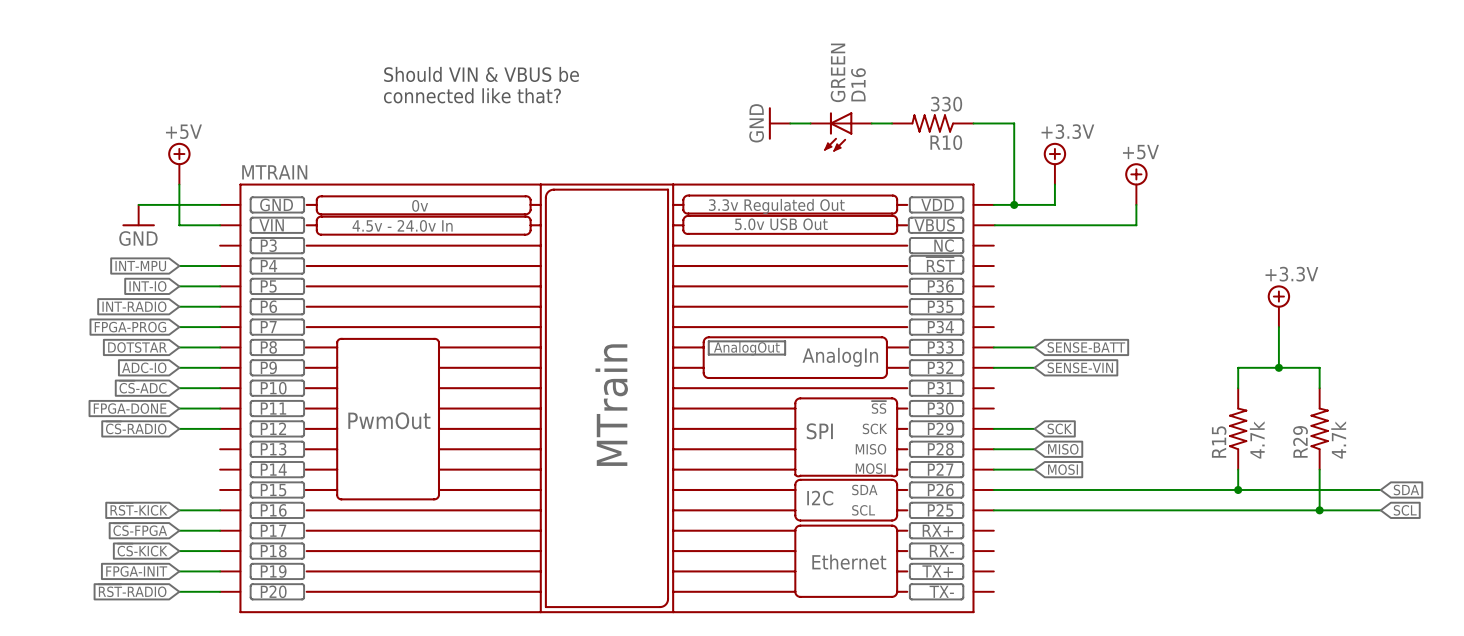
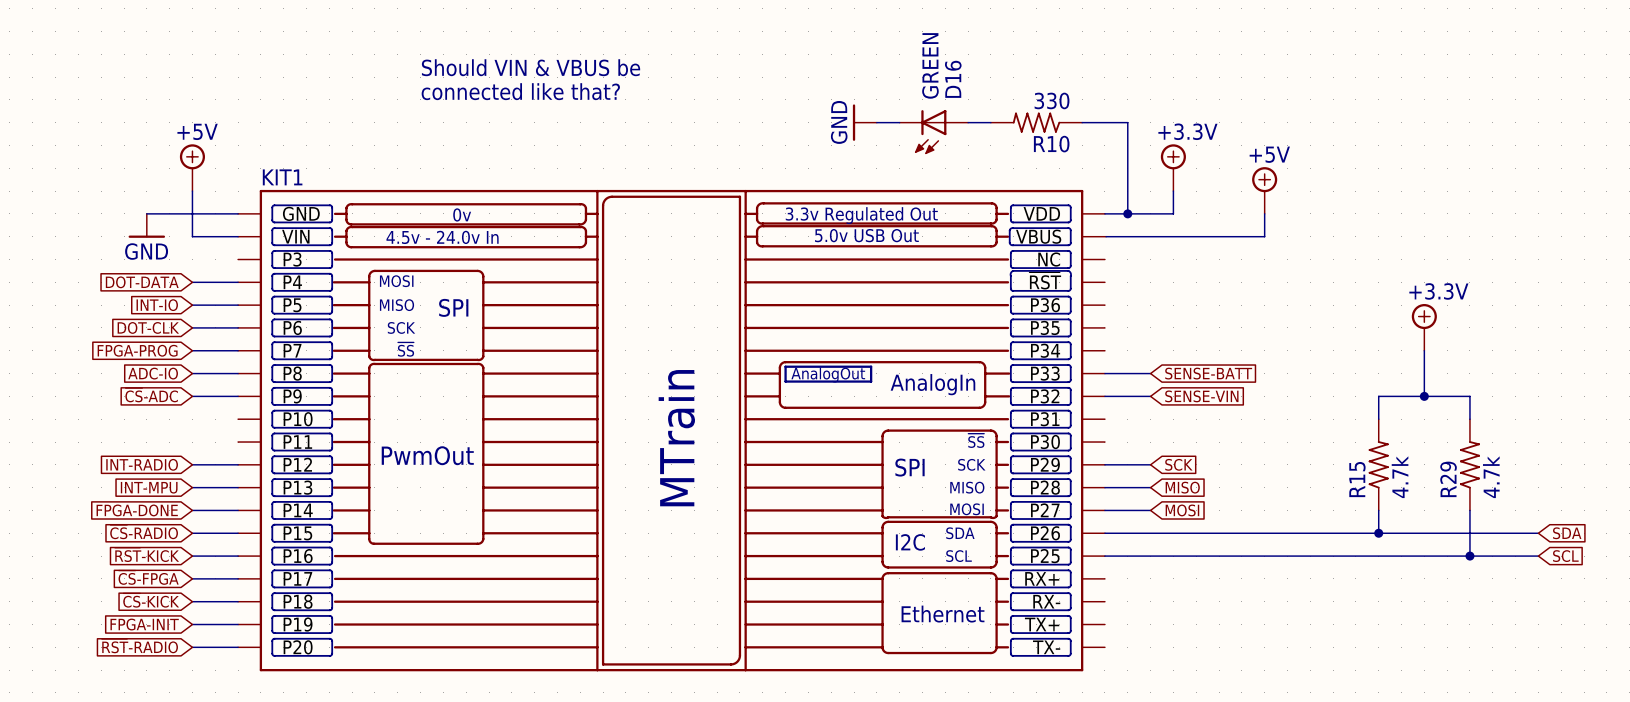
global label: INT-MPU (140, 266) -> DOT-DATA (142, 282)
global label: INT-RADIO (134, 306) -> DOT-CLK (148, 327)
global label: DOTSTAR (137, 347) -> ADC-IO (153, 373)
global label: ADC-IO (144, 367) -> ~{CS}-ADC (151, 395)
global label: ~{CS}-ADC (142, 387) -> none
wire: (179, 388) (220, 388) -> (192, 487) (238, 487)
MTRAIN: (607, 398) -> none
KIT1: none -> (672, 430)
global label position: FPGA-DONE (130, 408) -> FPGA-DONE (137, 510)
wire: (179, 408) (220, 408) -> (192, 510) (238, 510)
global label: ~{CS}-RADIO (136, 427) -> INT-RADIO (142, 464)
global label: none -> INT-MPU (149, 487)
global label: none -> ~{CS}-RADIO (144, 532)
wire: none -> (192, 533) (238, 533)

